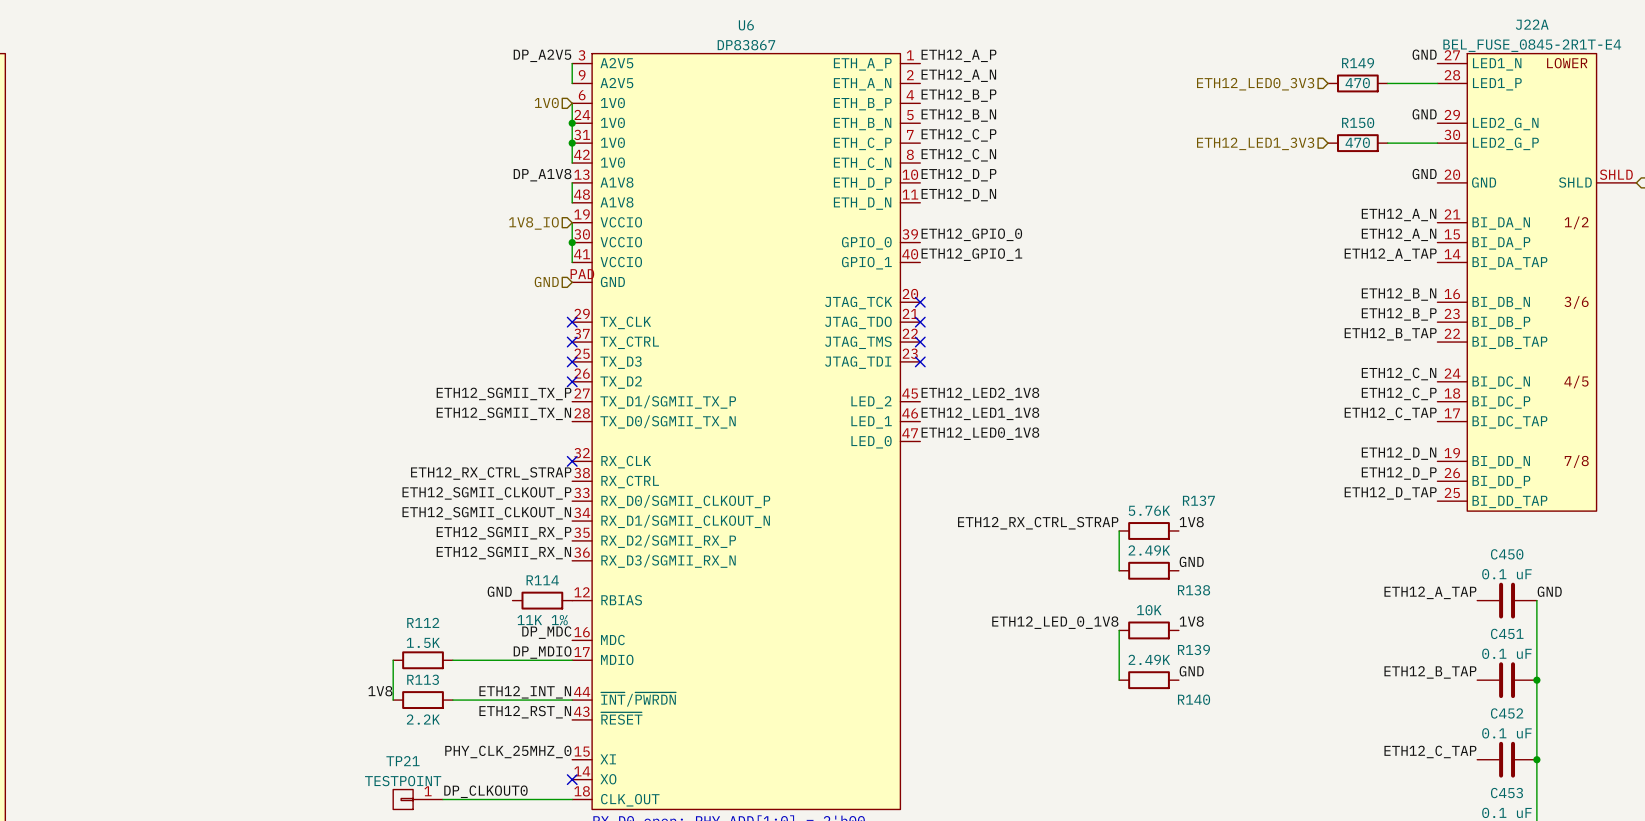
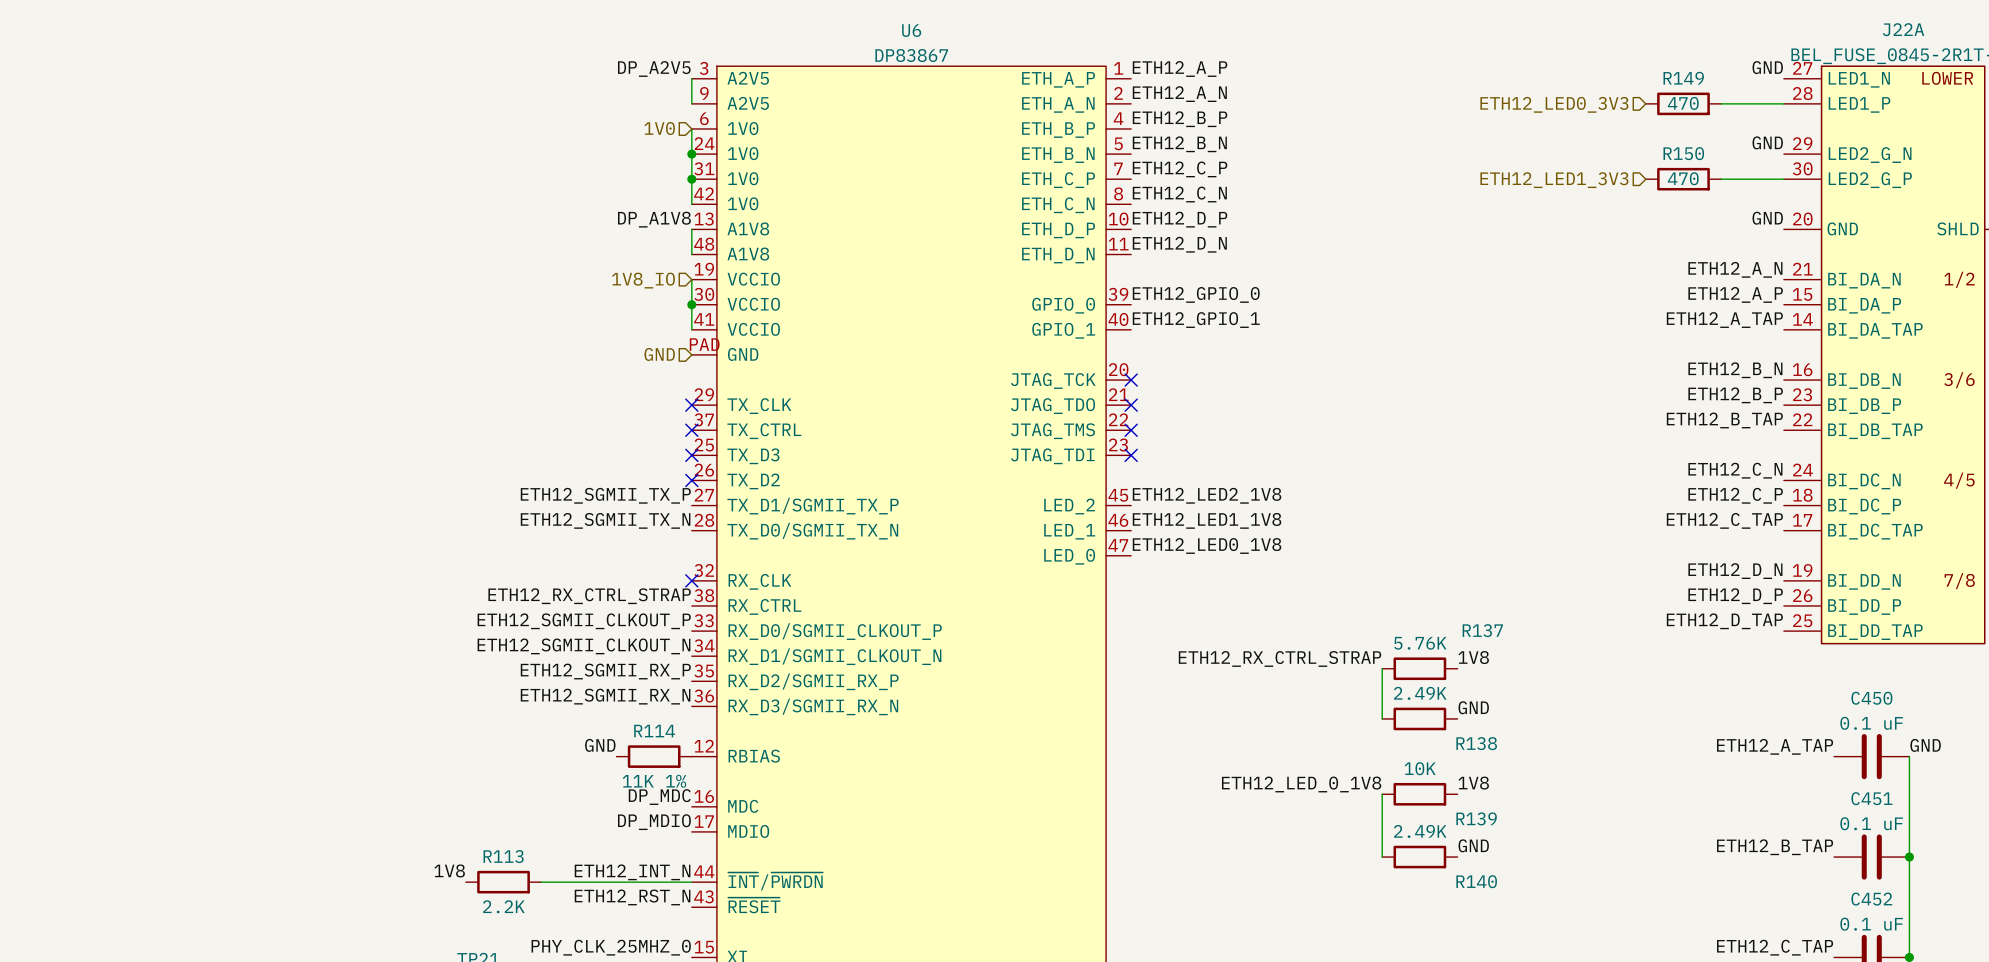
label: ETH12_A_N (1399, 234) -> ETH12_A_P (1735, 294)
wire: (393, 660) (393, 700) -> none
R112: 1.5K (423, 660) -> none
wire: (452, 660) (572, 660) -> none

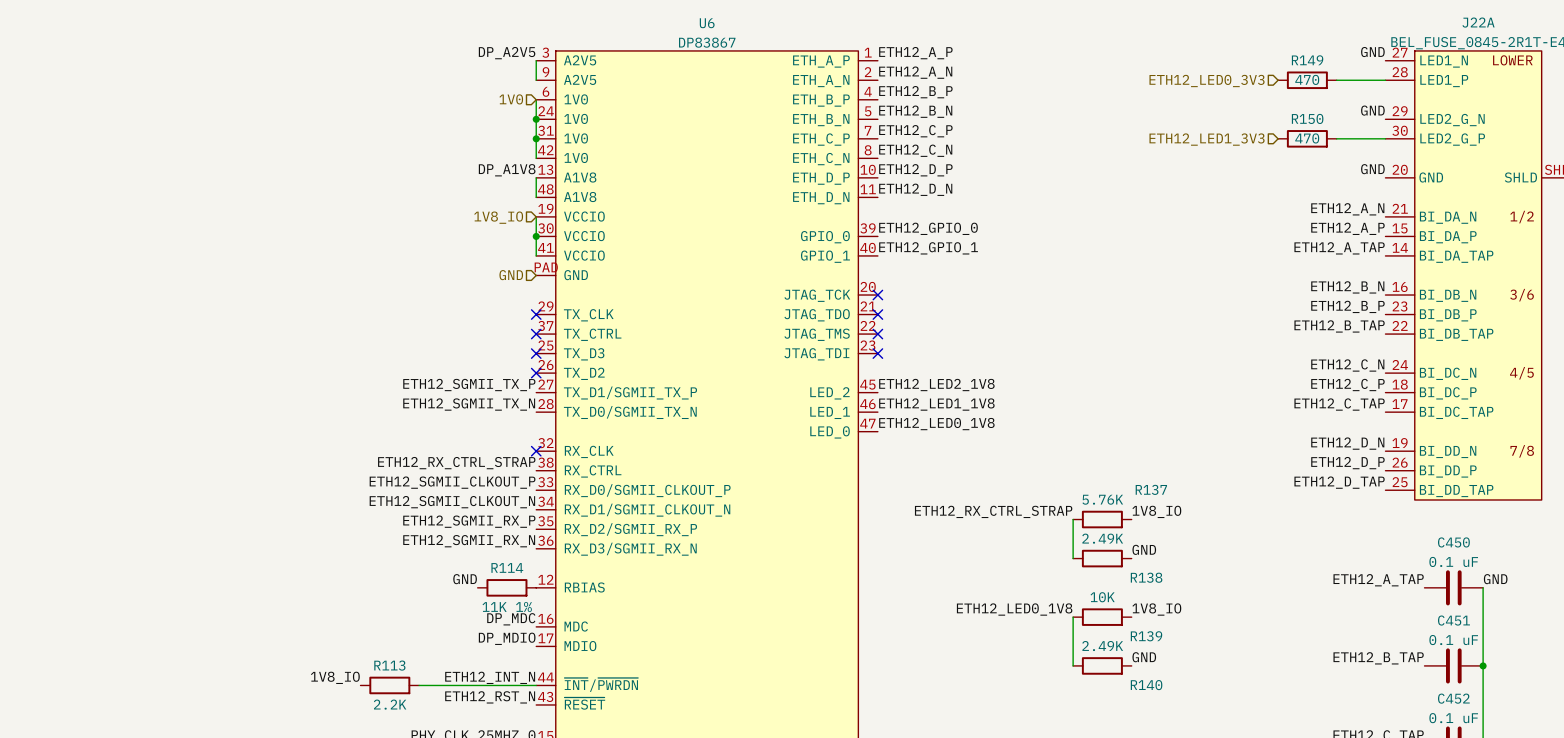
label: 1V8 (1473, 657) -> 1V8_IO (1156, 511)
label: 1V8 (1473, 783) -> 1V8_IO (1156, 609)
label: ETH12_LED_0_1V8 (1301, 784) -> ETH12_LED0_1V8 (1014, 609)
label: 1V8 (449, 870) -> 1V8_IO (335, 677)

